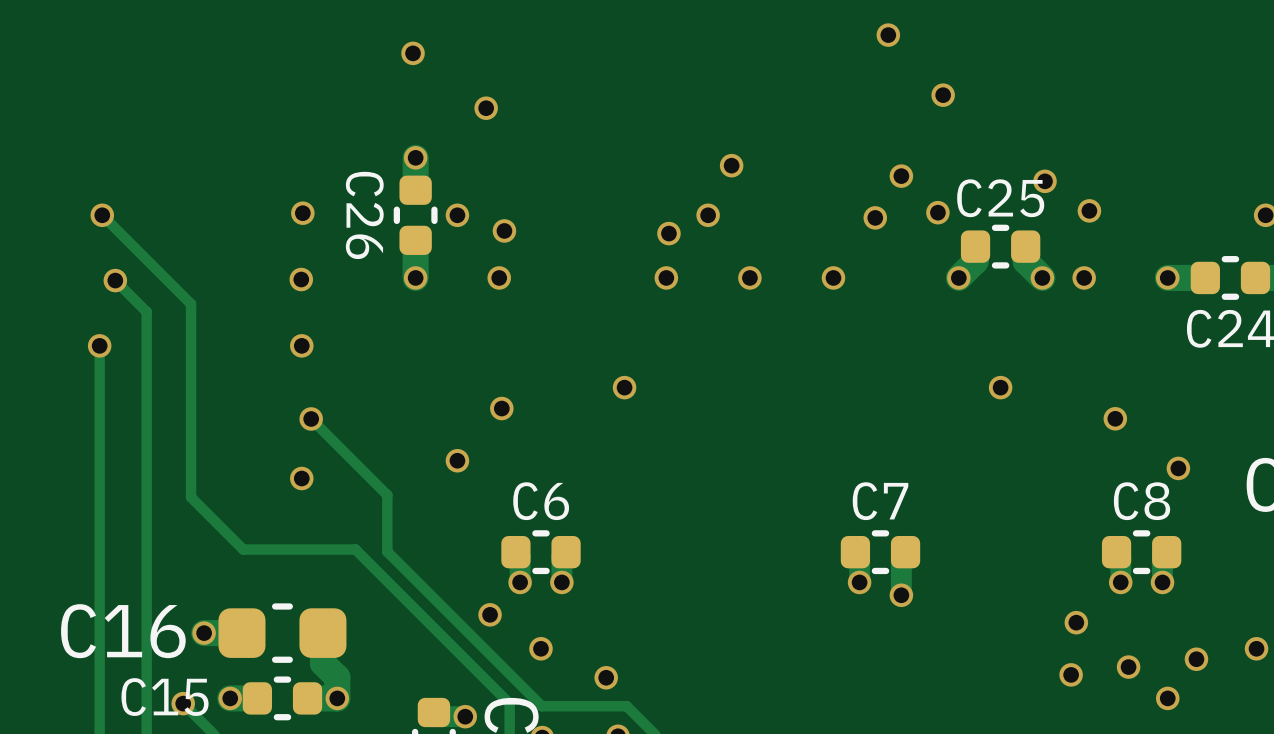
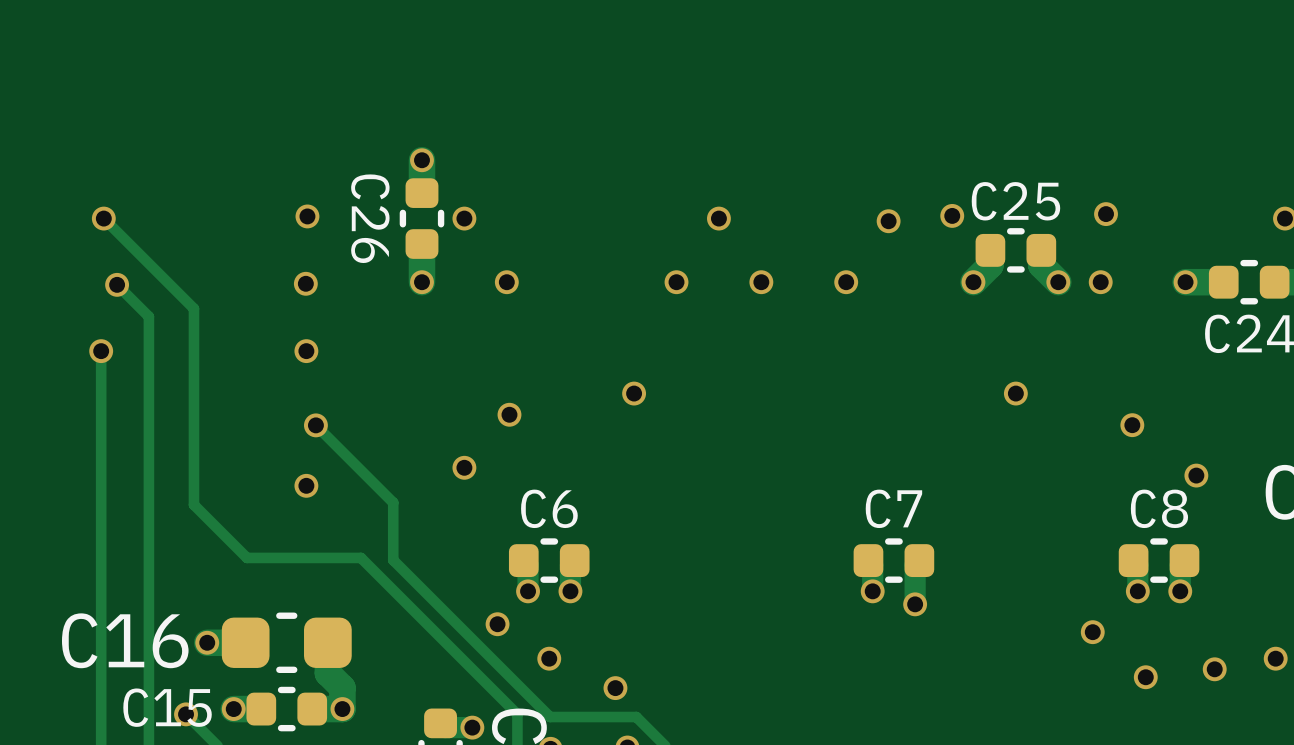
via: (888, 35) -> none
via: (413, 53) -> none
via: (943, 95) -> none
via: (486, 108) -> none
via: (731, 165) -> none
via: (901, 176) -> none
via: (1045, 181) -> none
via: (504, 230) -> none
via: (668, 233) -> none
via: (1071, 674) -> none
via: (1167, 698) -> none

